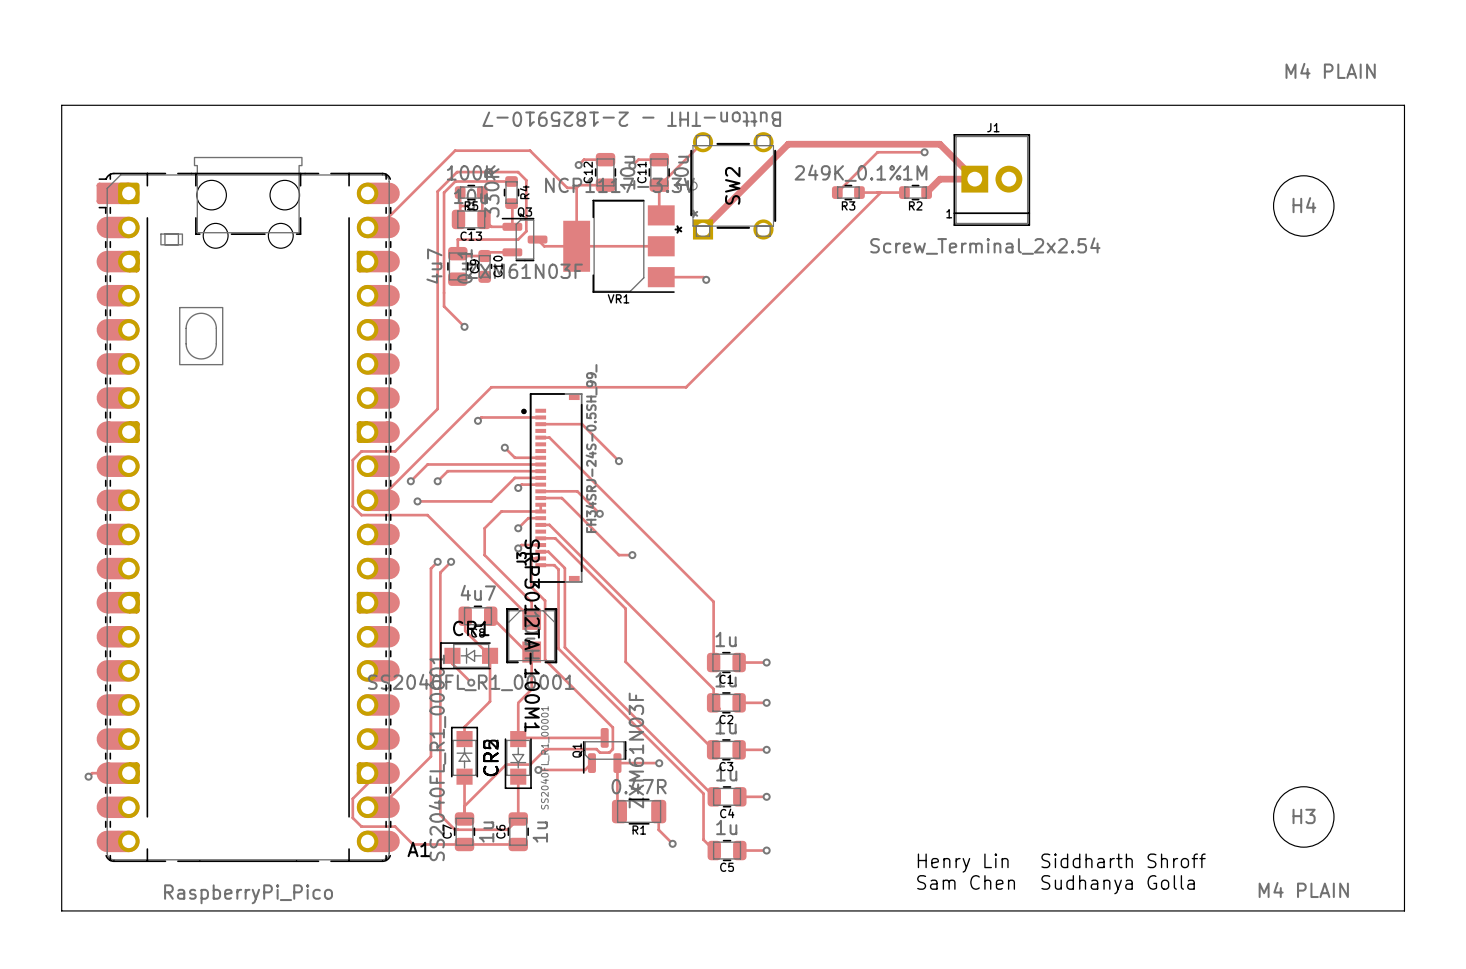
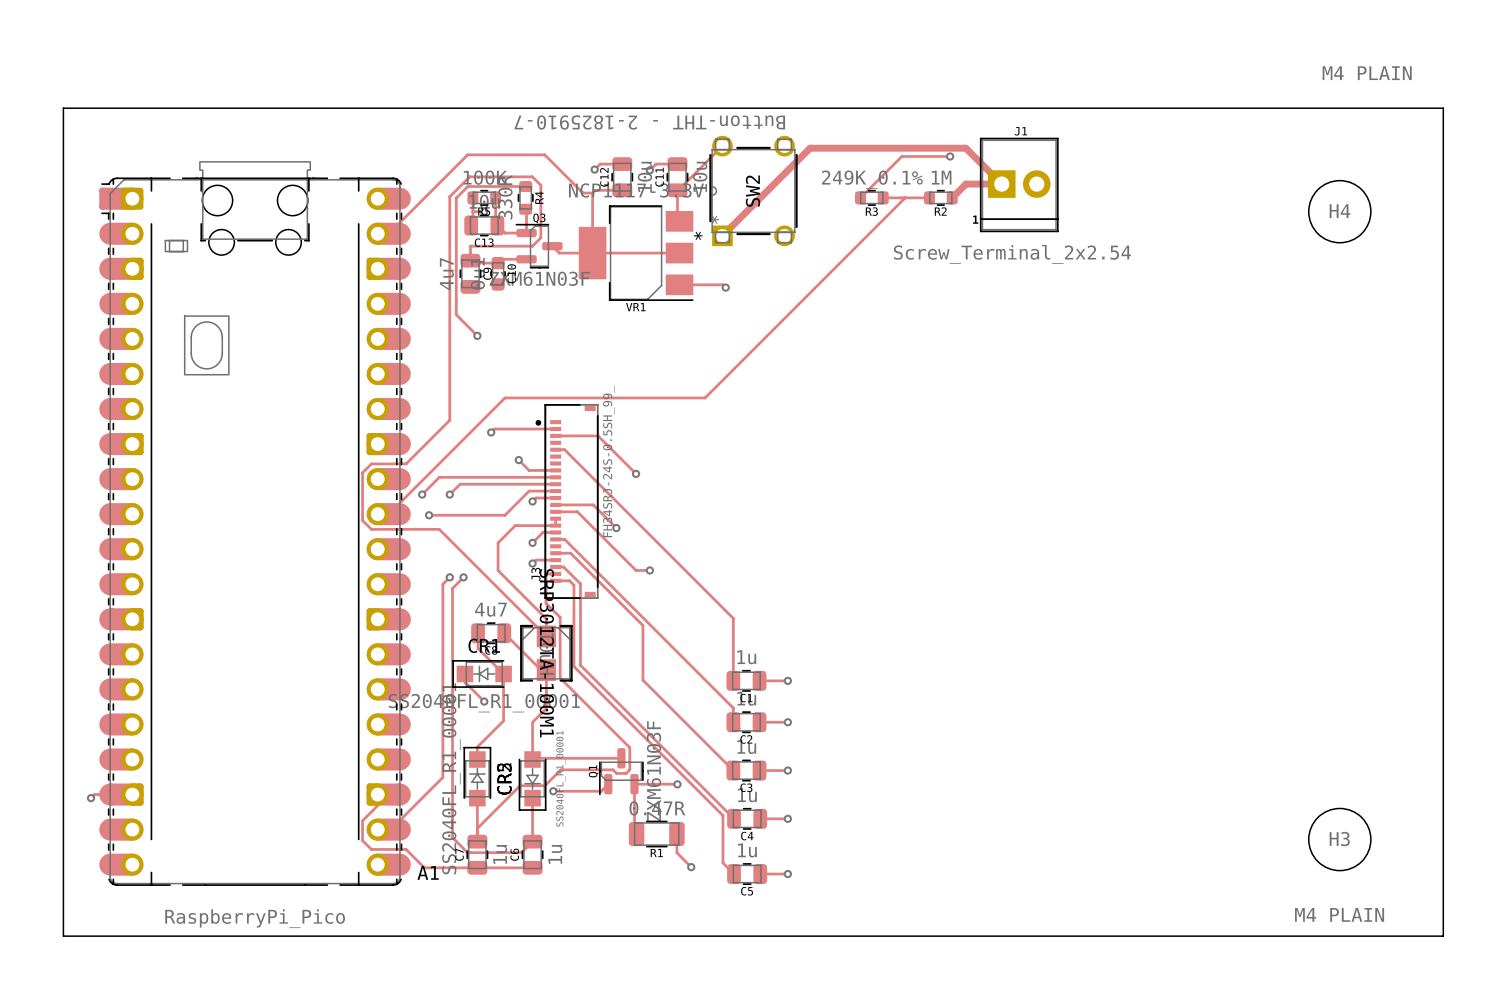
text: Siddharth Shroff (1123, 860) -> none
text: Henry Lin (963, 863) -> none
text: Sam Chen (966, 882) -> none
text: Sudhanya Golla (1118, 884) -> none

